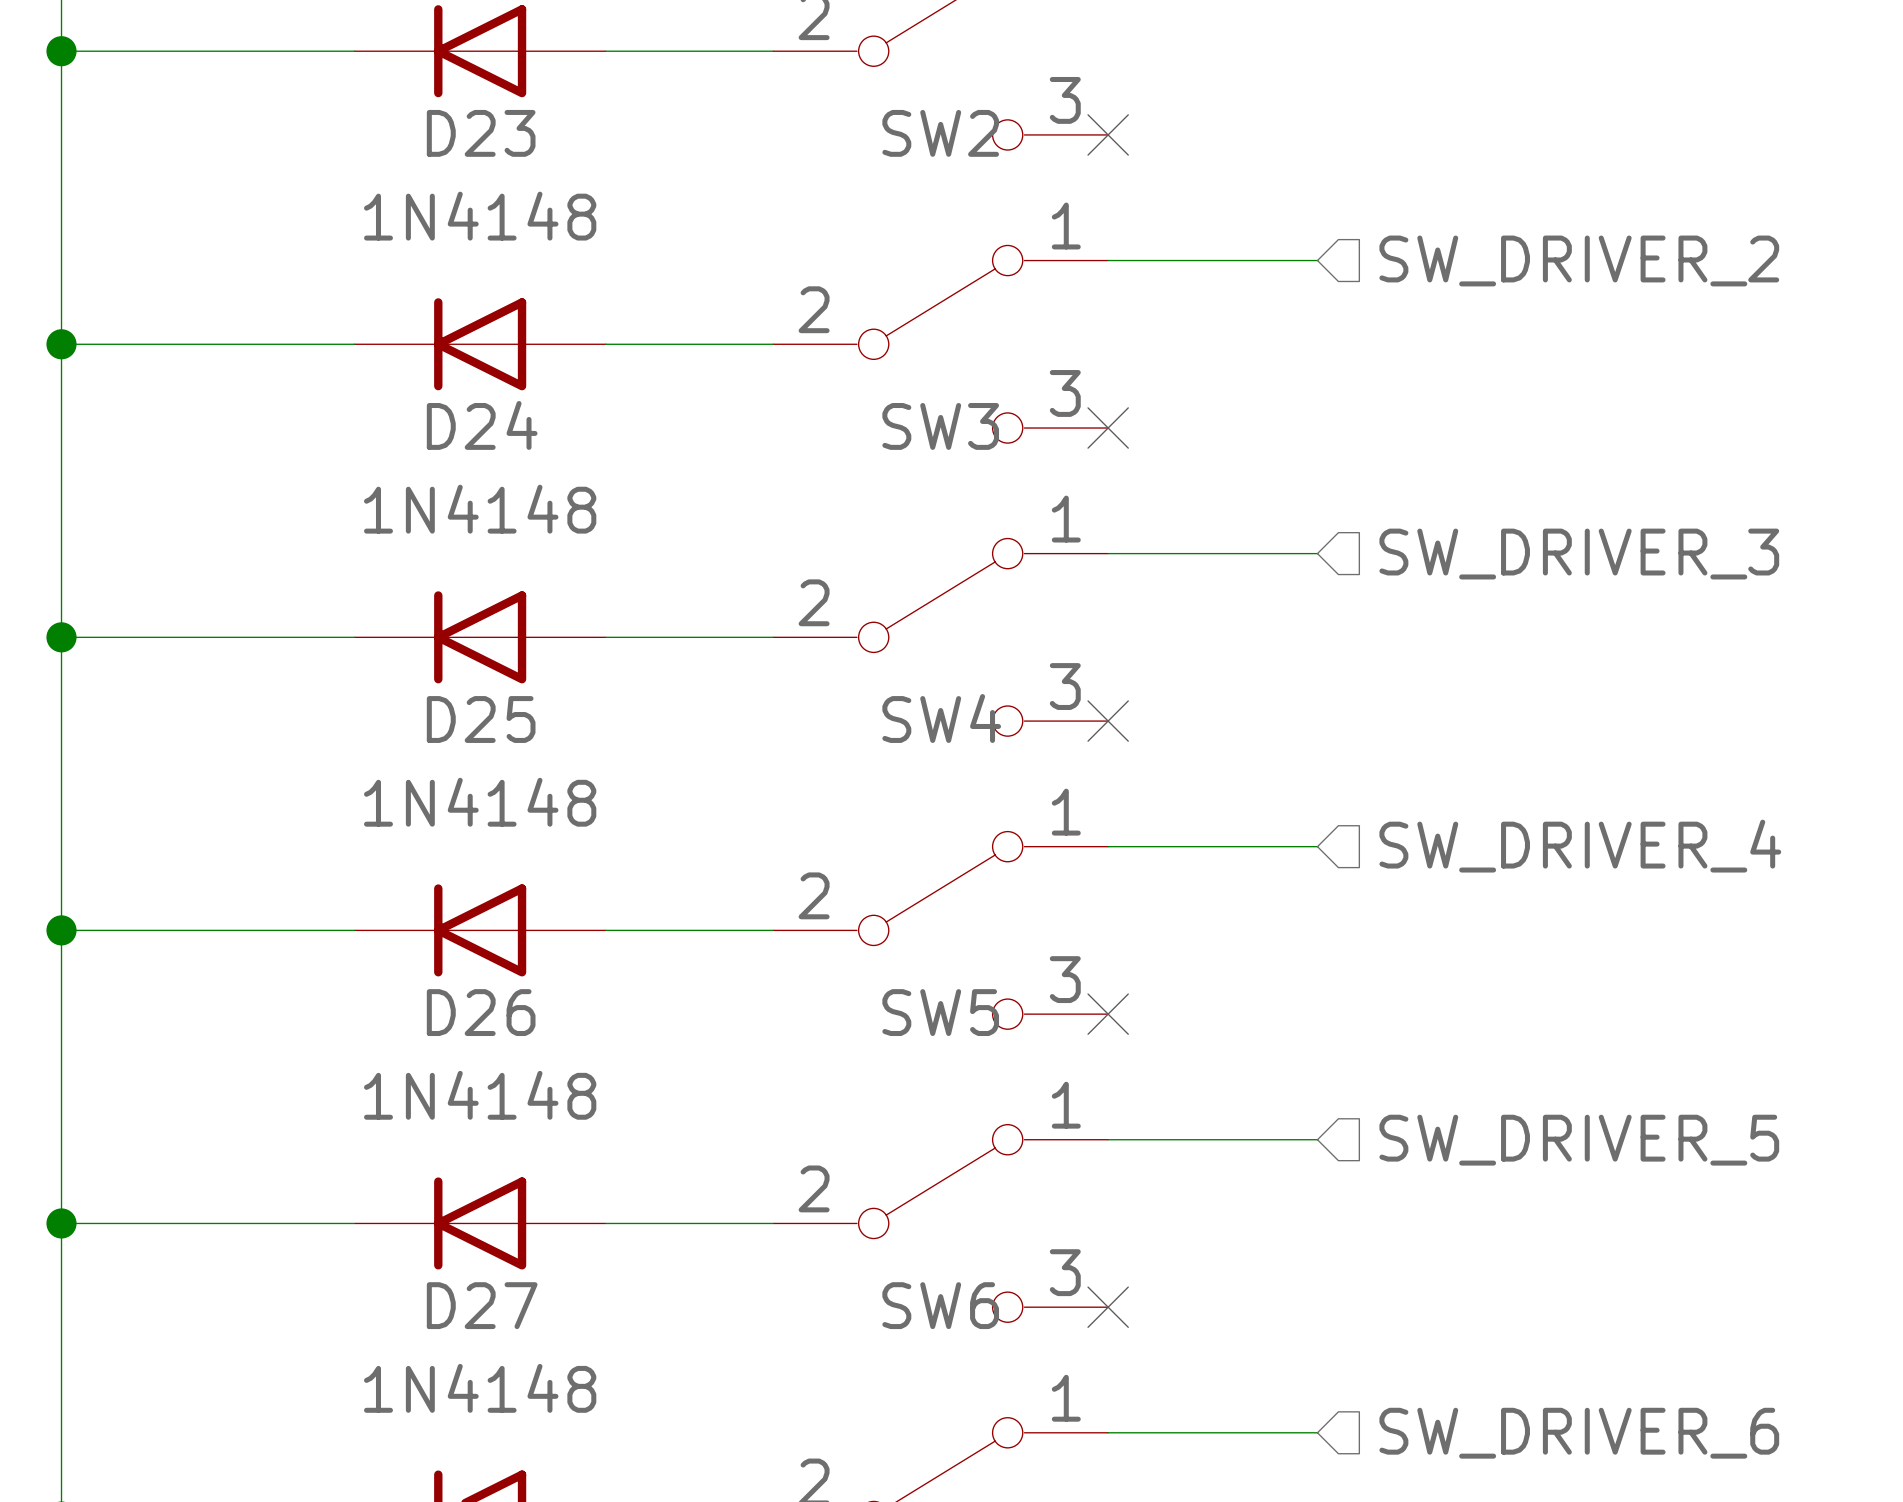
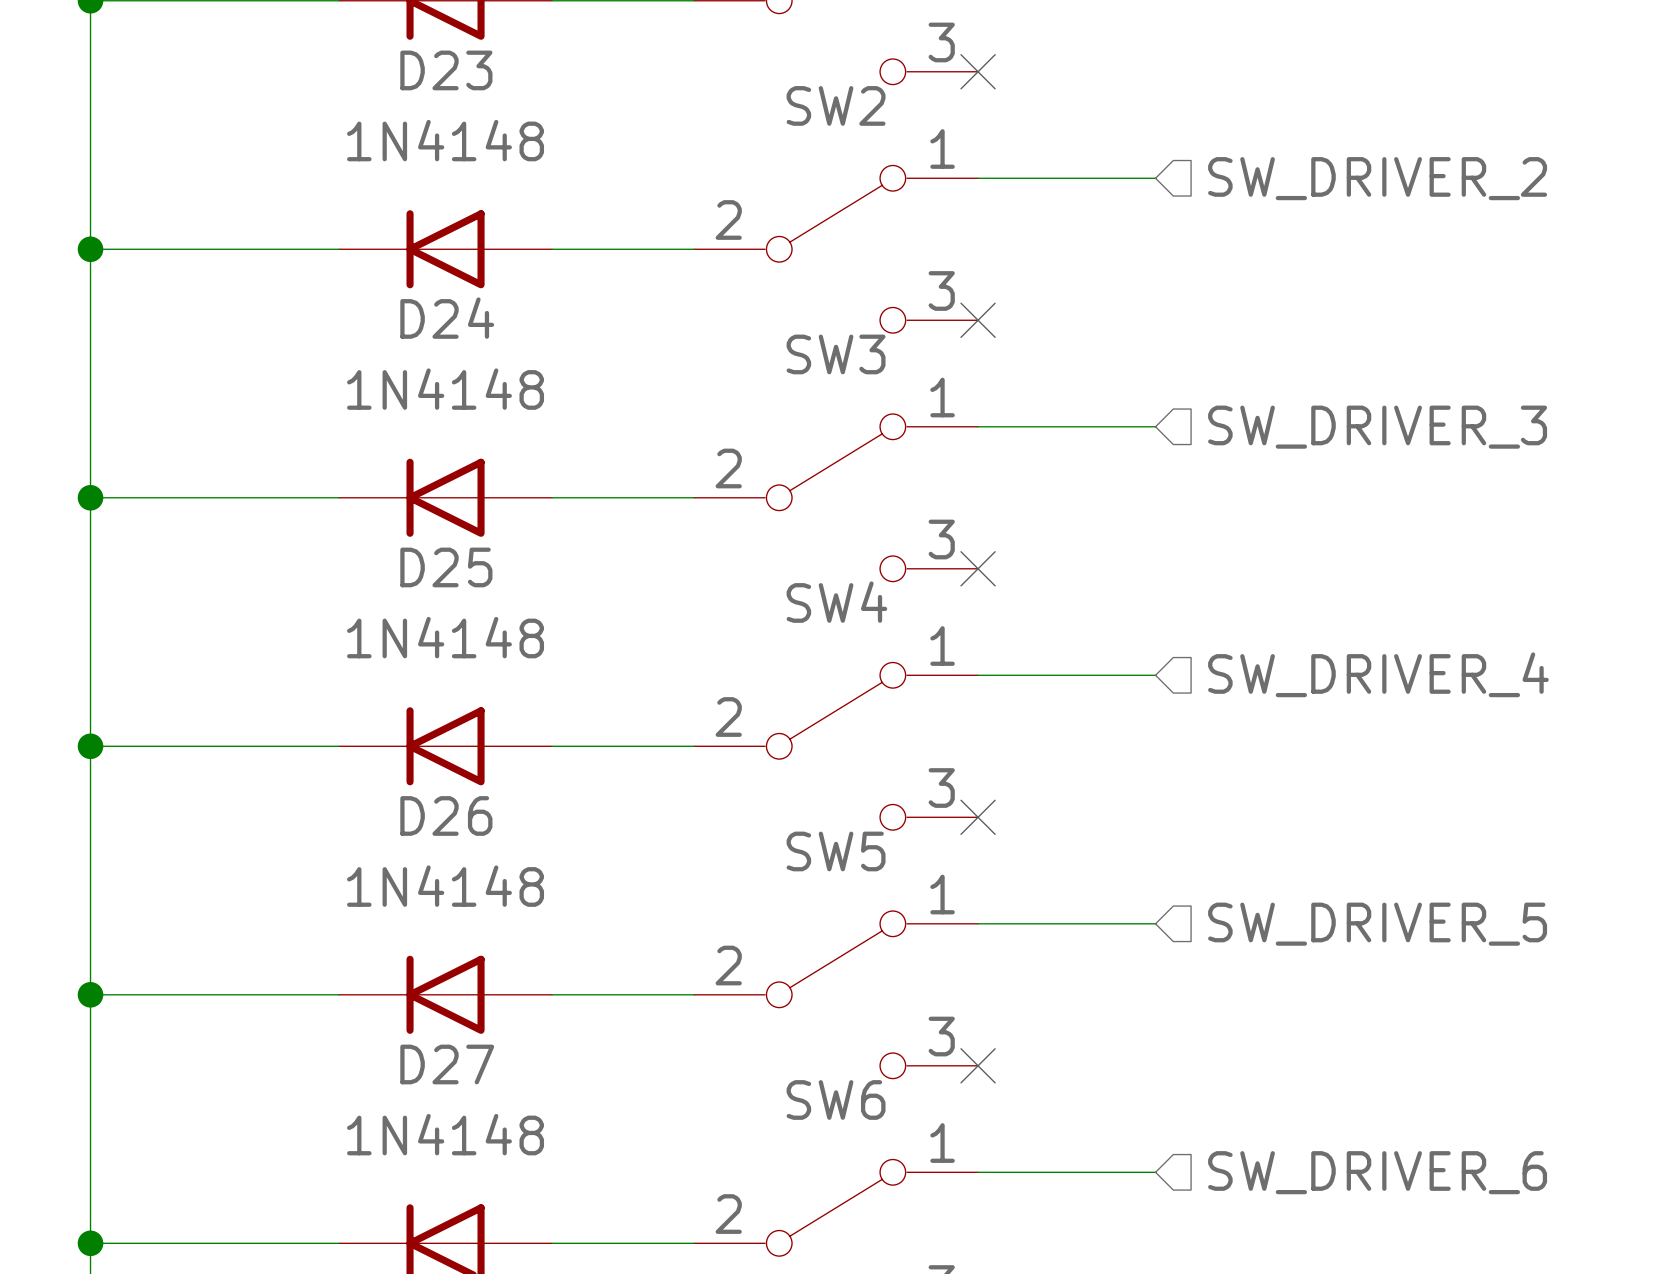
SW2 name position: SW2 (940, 133) -> SW2 (836, 105)
SW3 name position: SW3 (940, 426) -> SW3 (836, 354)
SW4 name position: SW4 (941, 718) -> SW4 (836, 602)
SW5 name position: SW5 (940, 1012) -> SW5 (836, 851)
SW6 name position: SW6 (940, 1305) -> SW6 (836, 1099)

